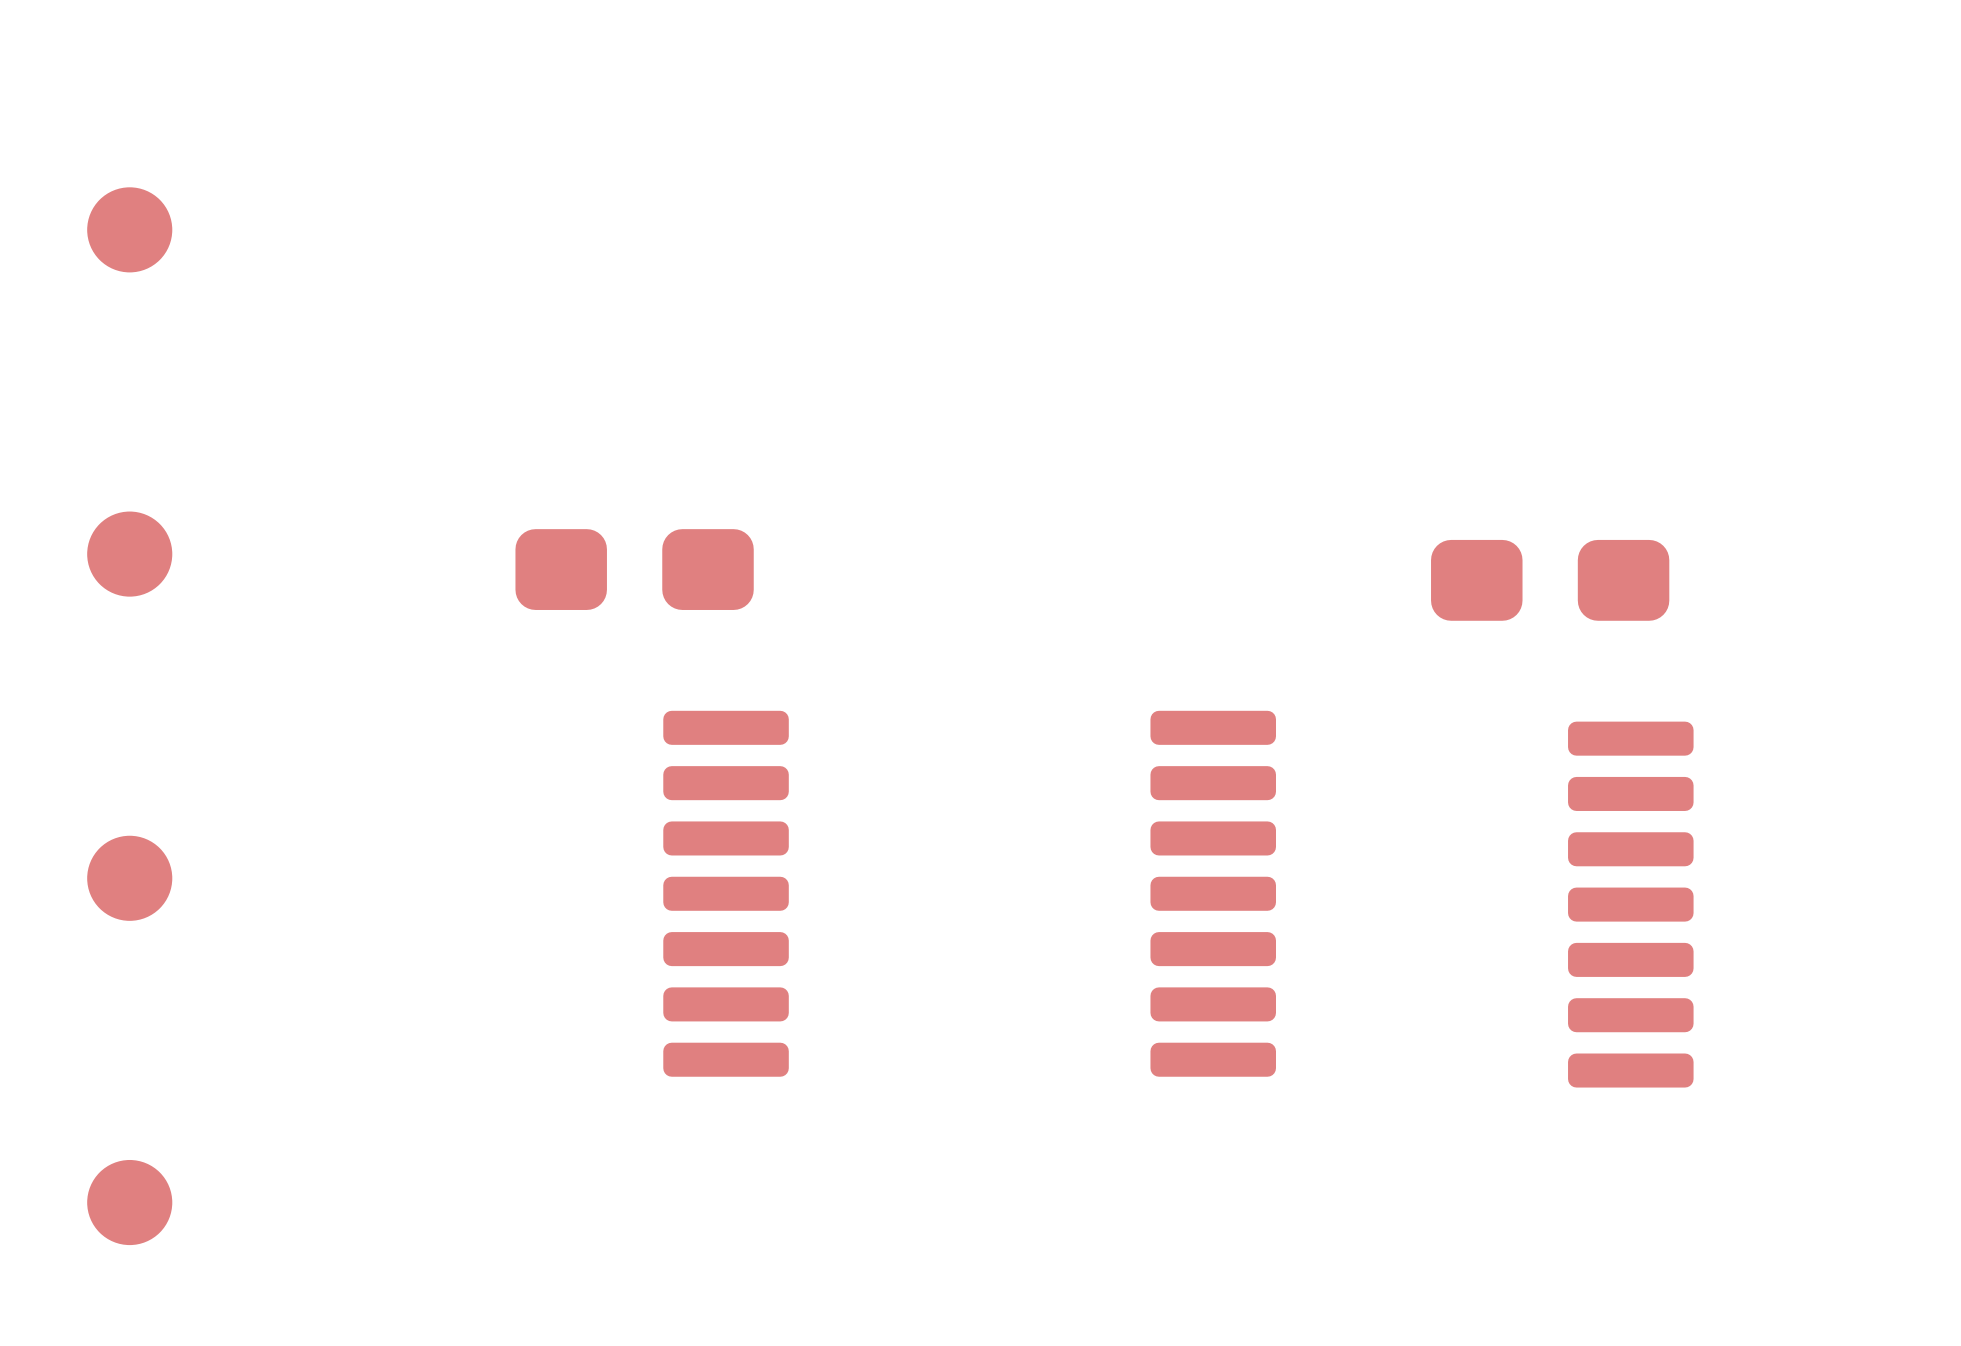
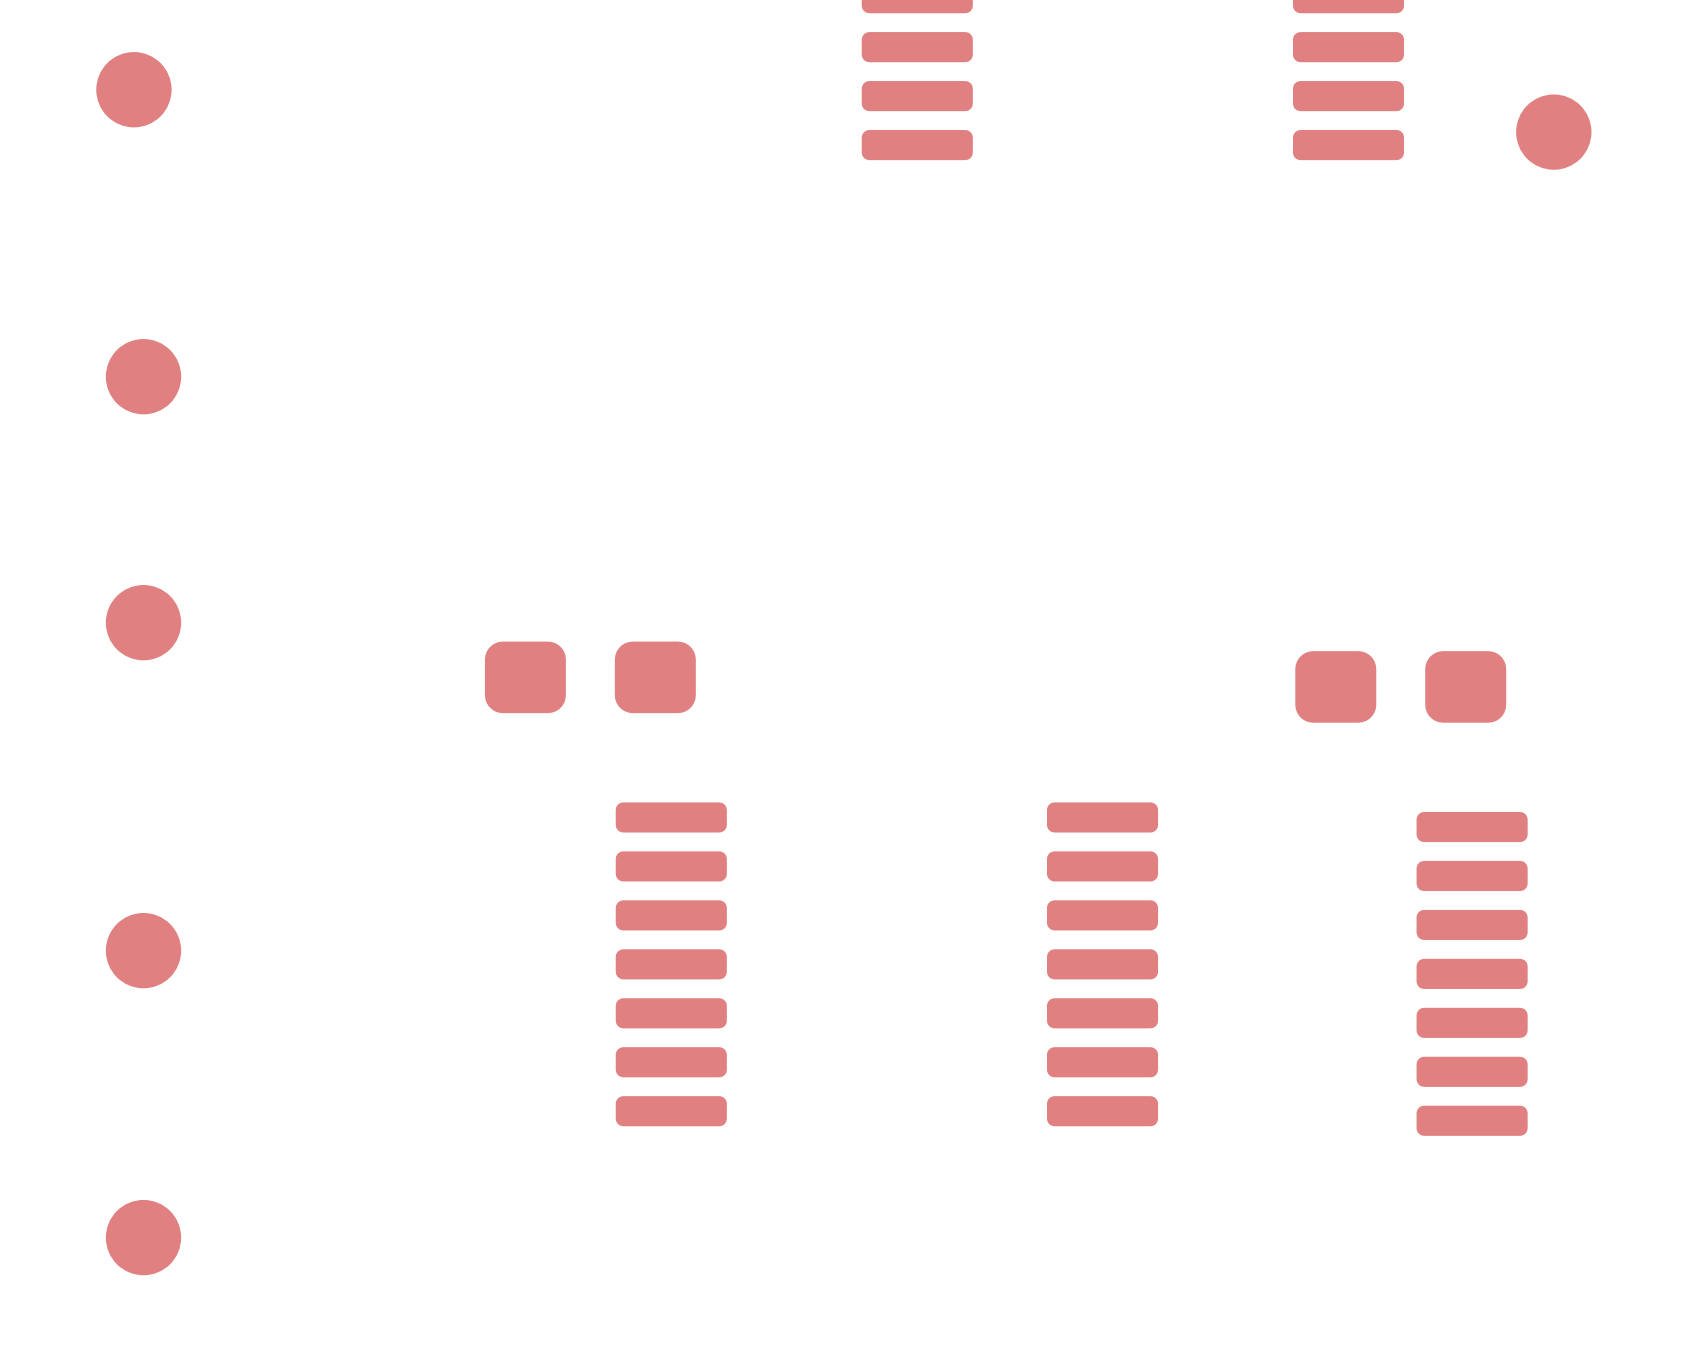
part position: (129, 554) -> (143, 622)

